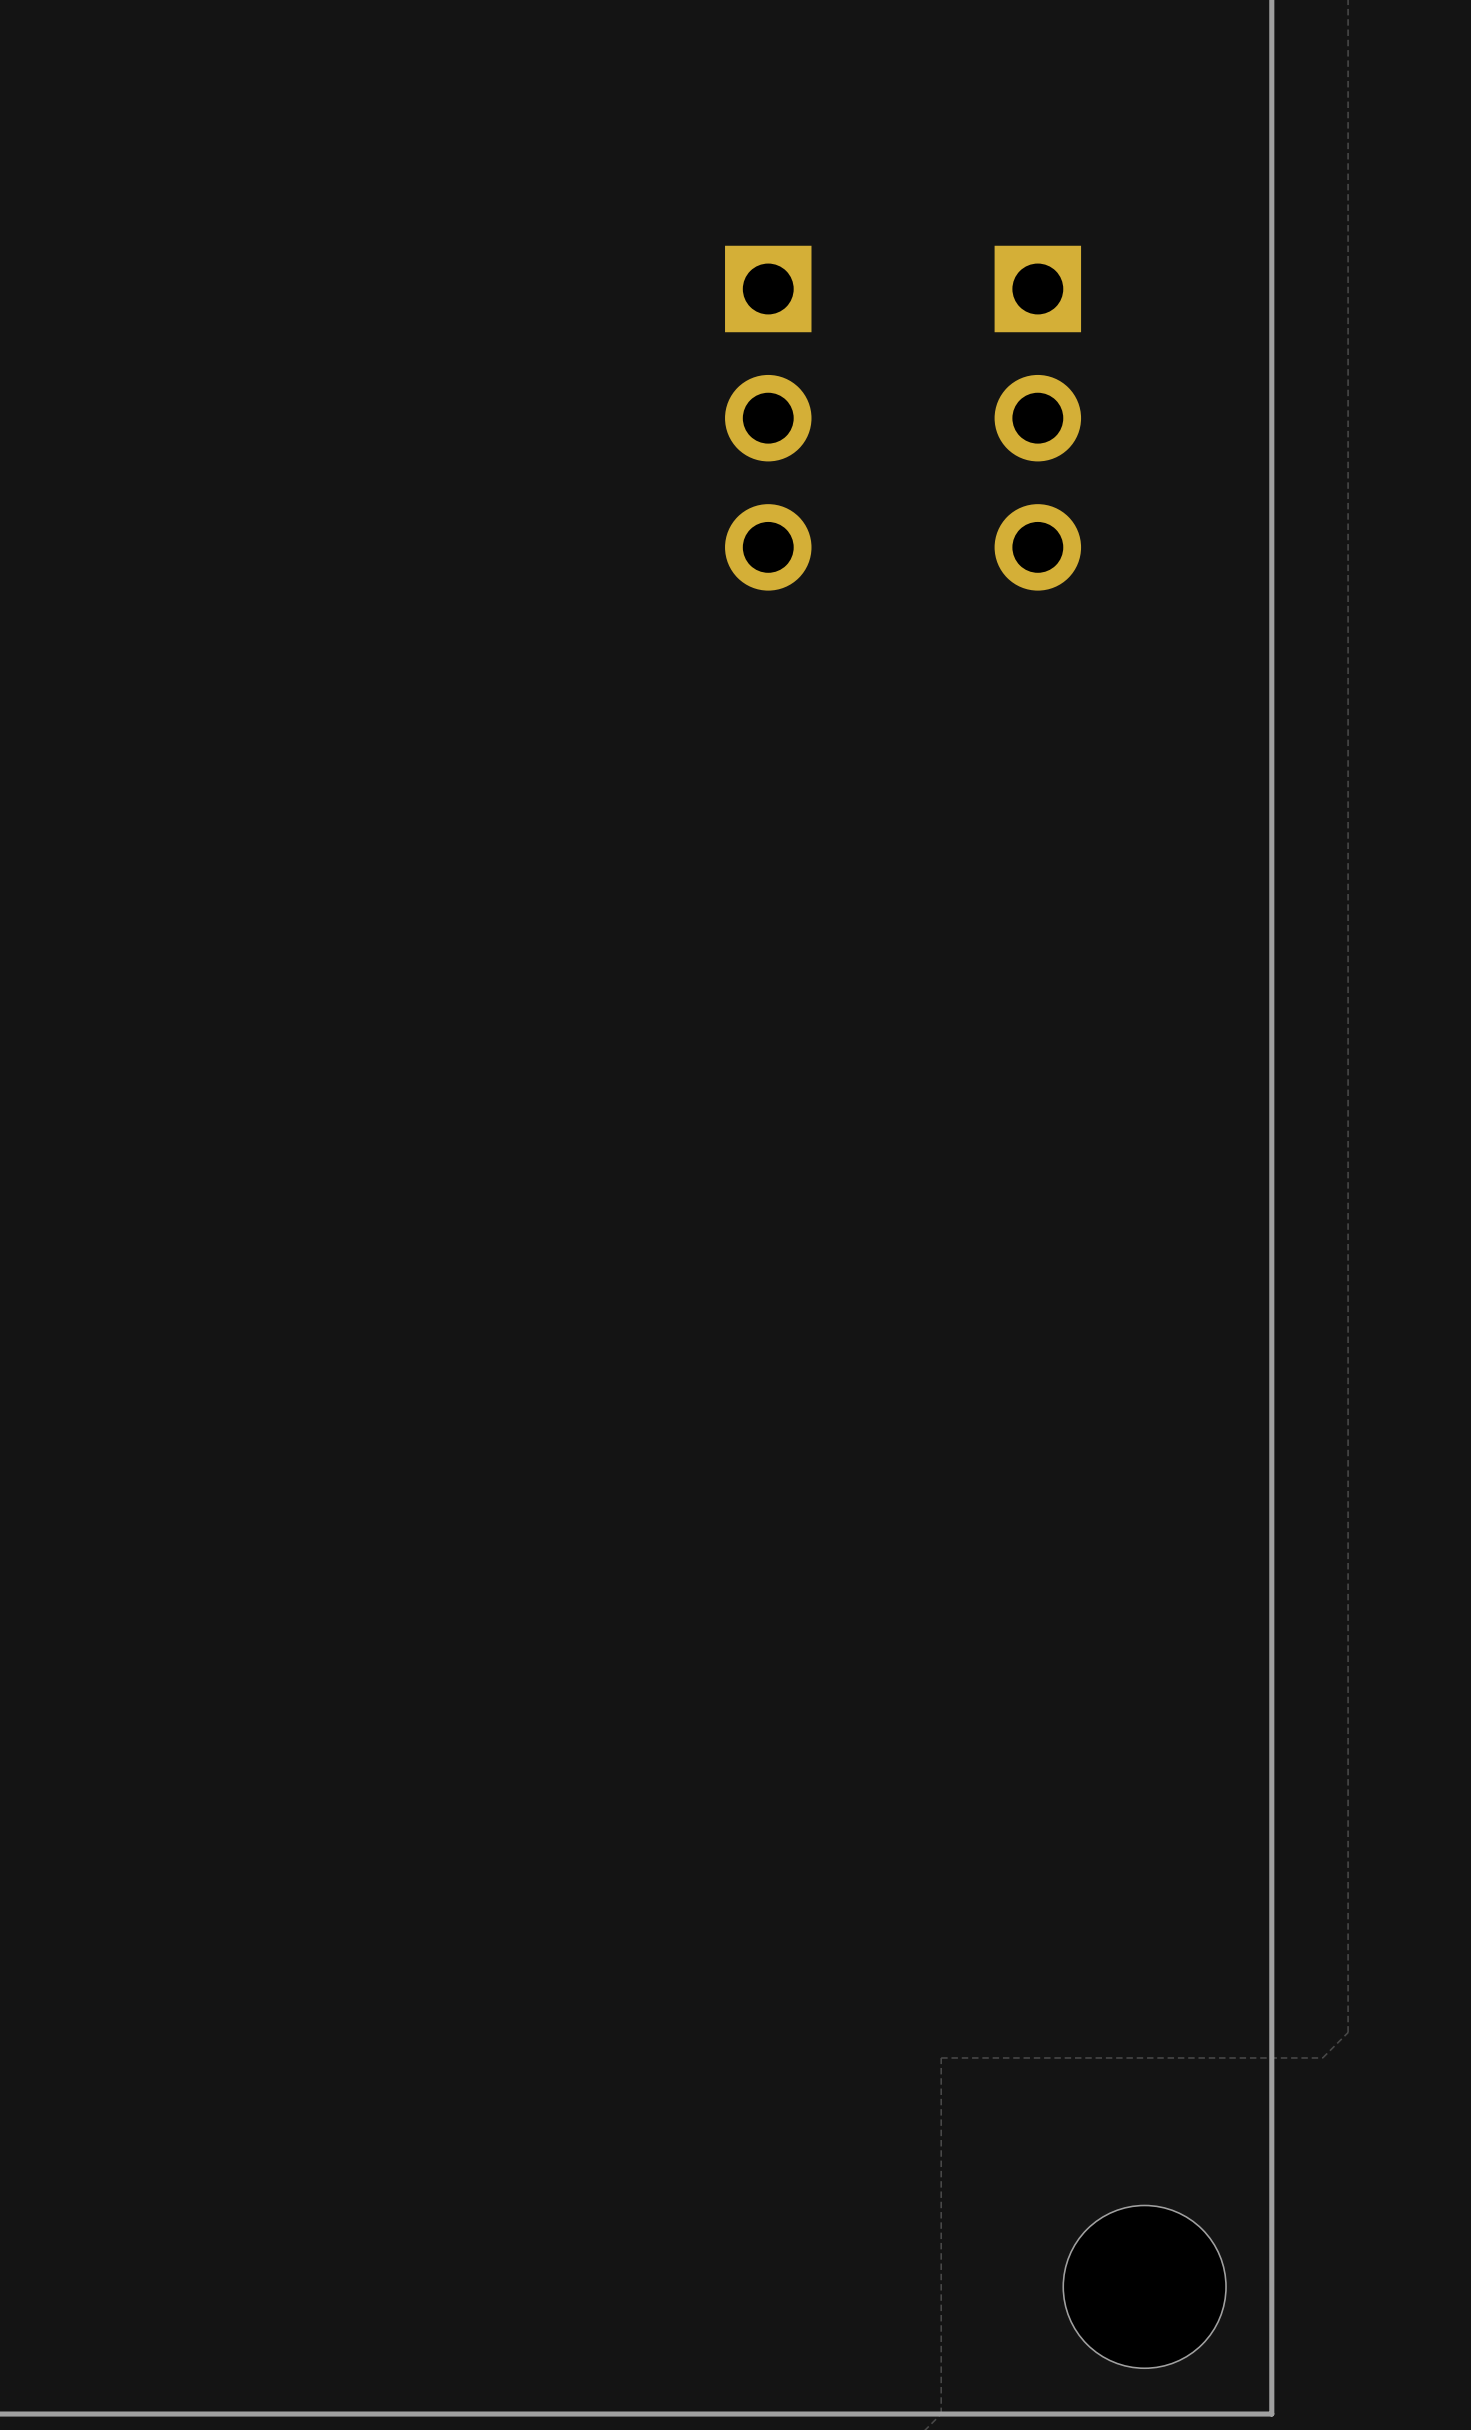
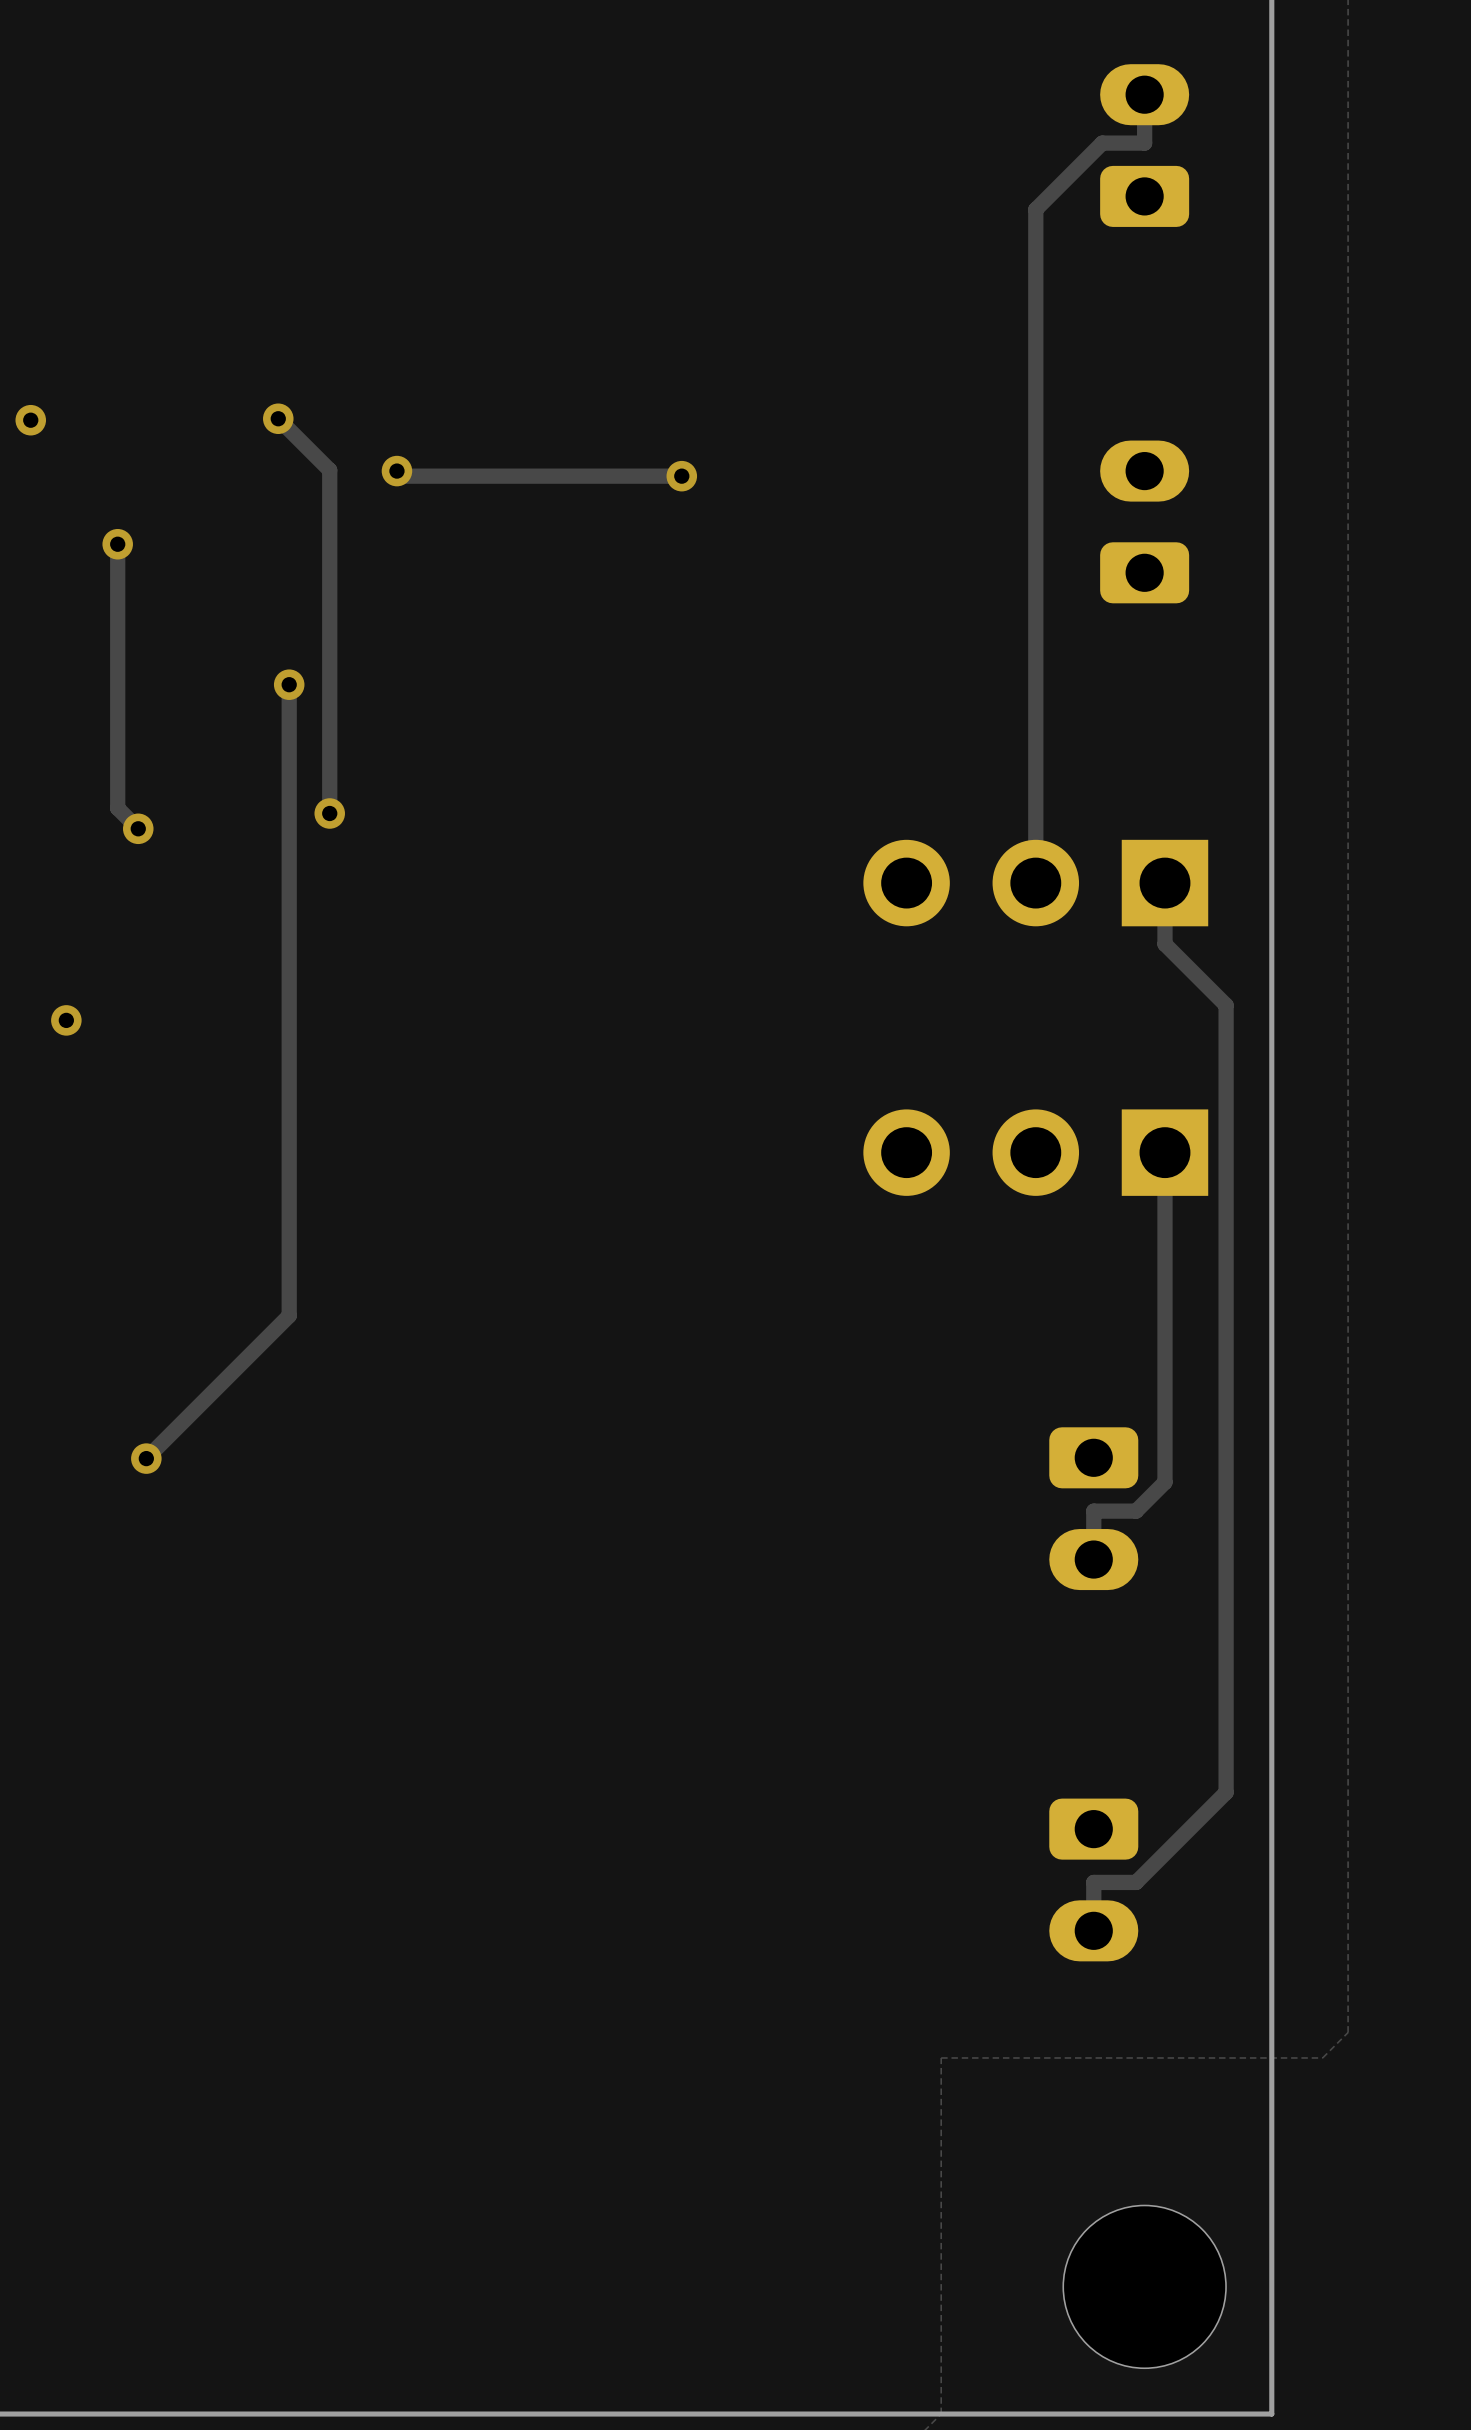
track: none -> (1144, 94) (1144, 143) (1102, 143) (1035, 209) (1035, 883)
part: none -> (1144, 145)
track: none -> (278, 418) (329, 470) (329, 813)
via: none -> (278, 418)
part: (768, 418) -> none
part: (1037, 418) -> none
via: none -> (30, 420)
track: none -> (396, 471) (402, 476) (681, 476)
via: none -> (396, 471)
via: none -> (681, 476)
part: none -> (1144, 521)
track: none -> (117, 544) (117, 808) (138, 828)
via: none -> (117, 544)
track: none -> (289, 684) (289, 1315) (146, 1458)
via: none -> (289, 684)
via: none -> (329, 813)
via: none -> (138, 828)
part: none -> (1035, 883)
track: none -> (1164, 883) (1164, 944) (1226, 1005) (1226, 1792) (1136, 1882) (1093, 1882) (1093, 1930)
via: none -> (66, 1020)
part: none -> (1035, 1152)
track: none -> (1164, 1152) (1164, 1482) (1136, 1511) (1093, 1511) (1093, 1559)
via: none -> (146, 1458)
part: none -> (1093, 1508)
part: none -> (1093, 1879)

